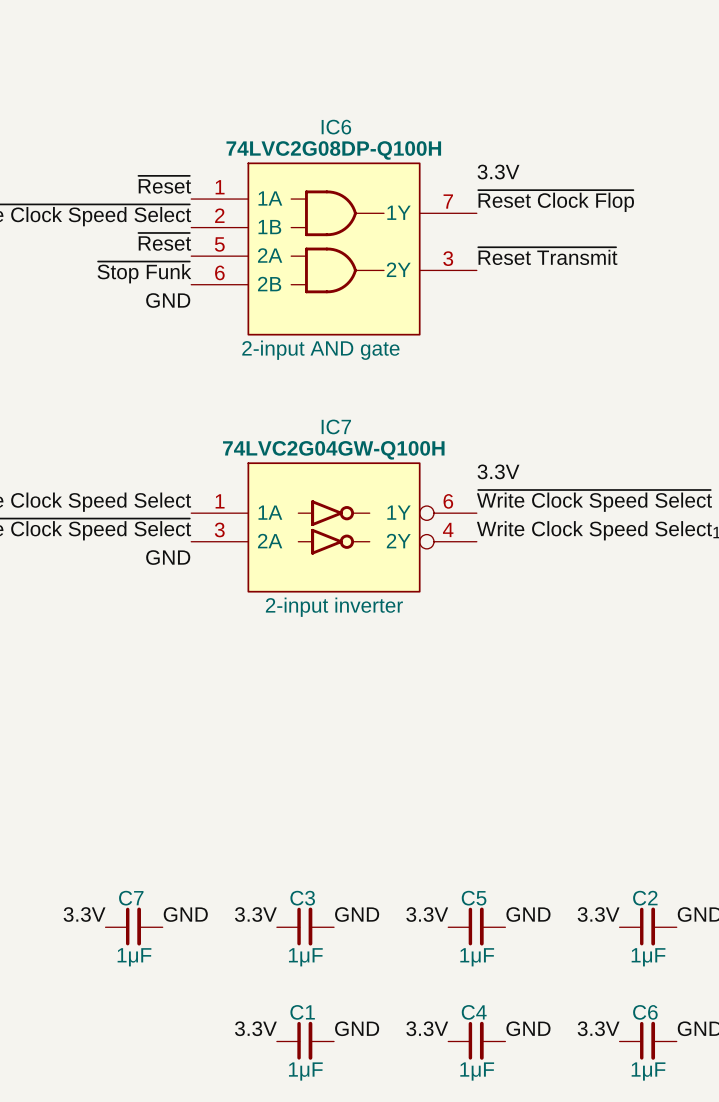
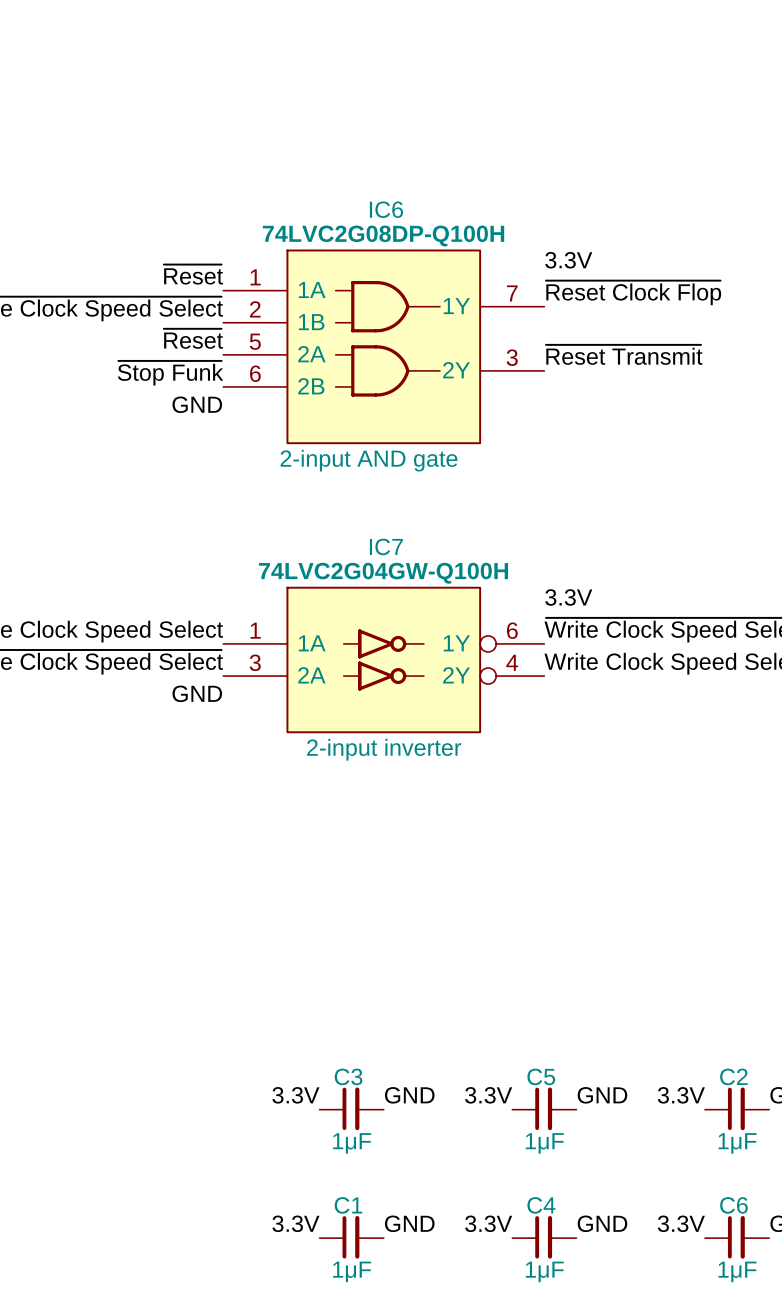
label: 3.3V (84, 914) -> none
label: GND (185, 914) -> none
C7: 1μF (134, 926) -> none

